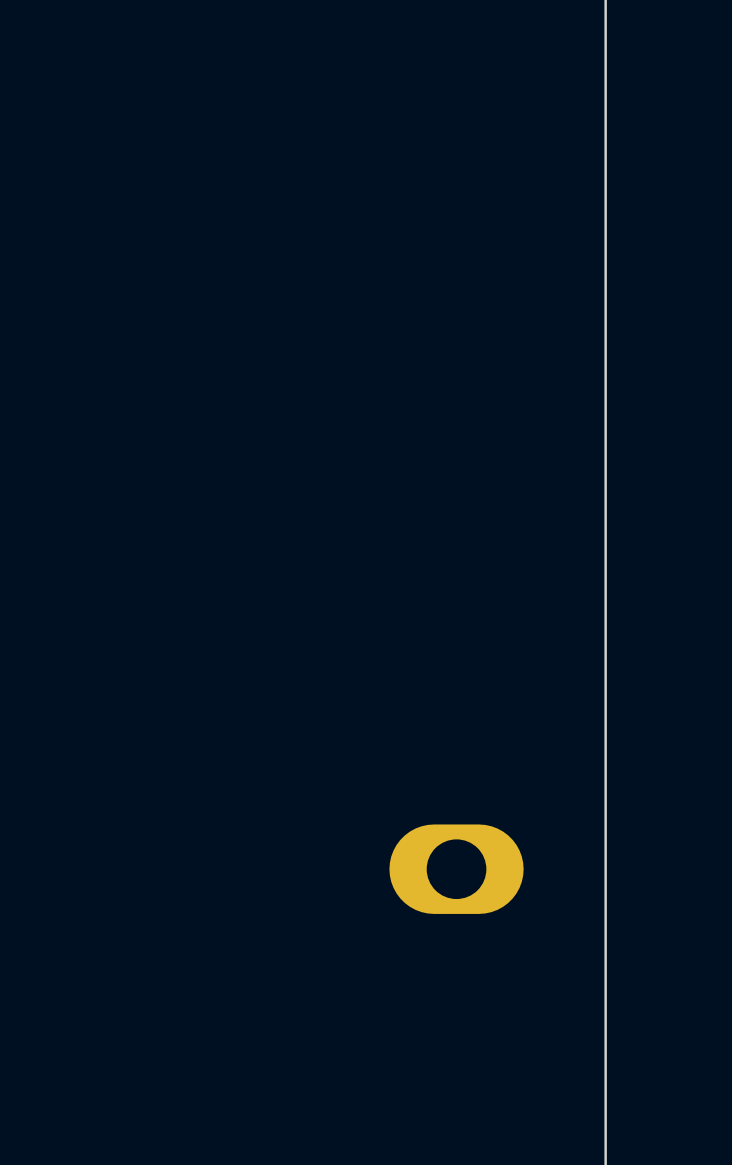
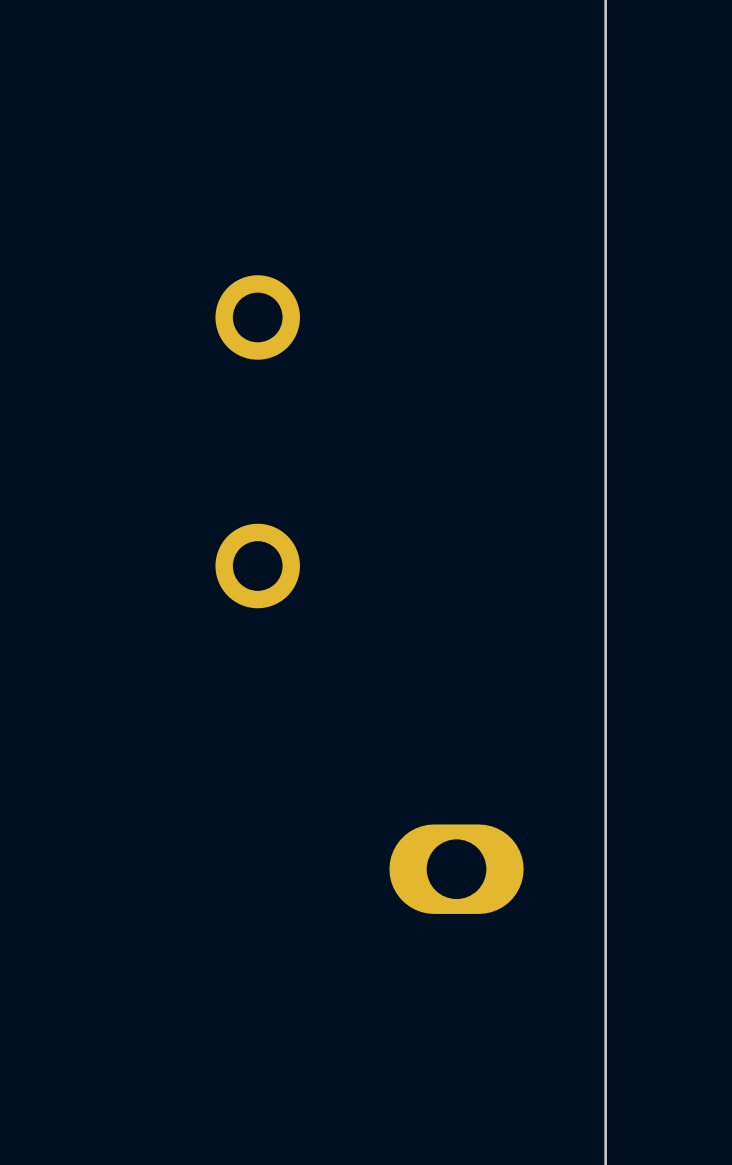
part: none -> (257, 317)
part: none -> (257, 566)

